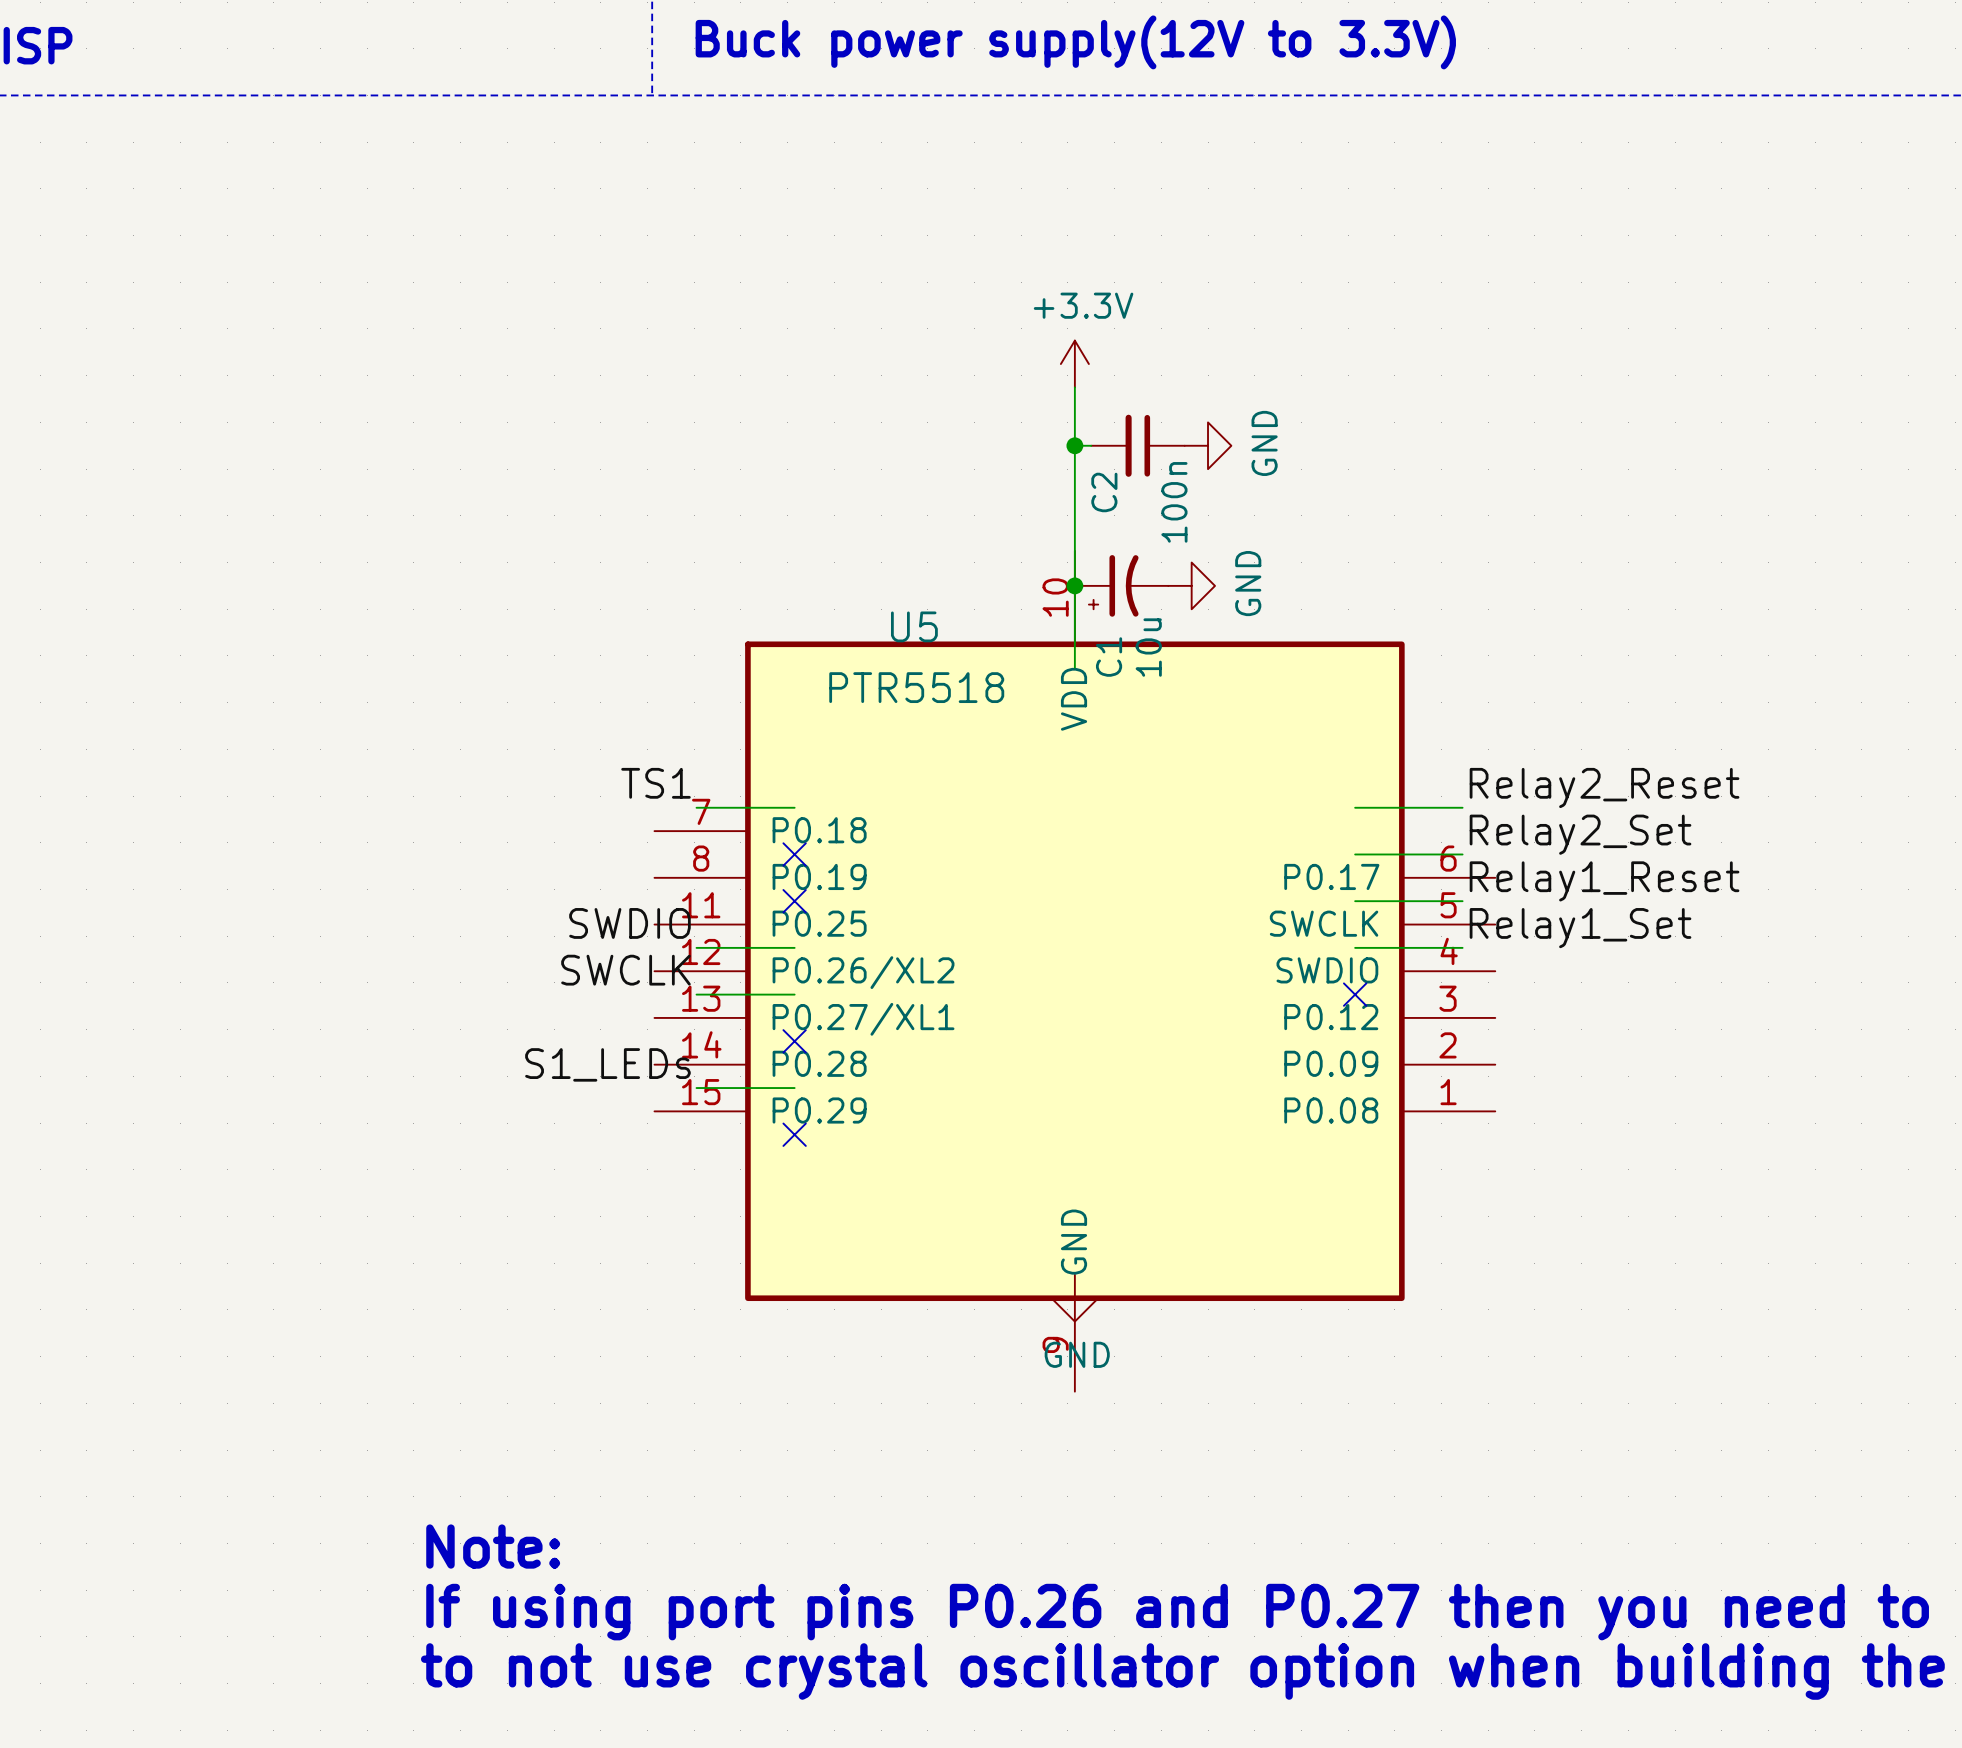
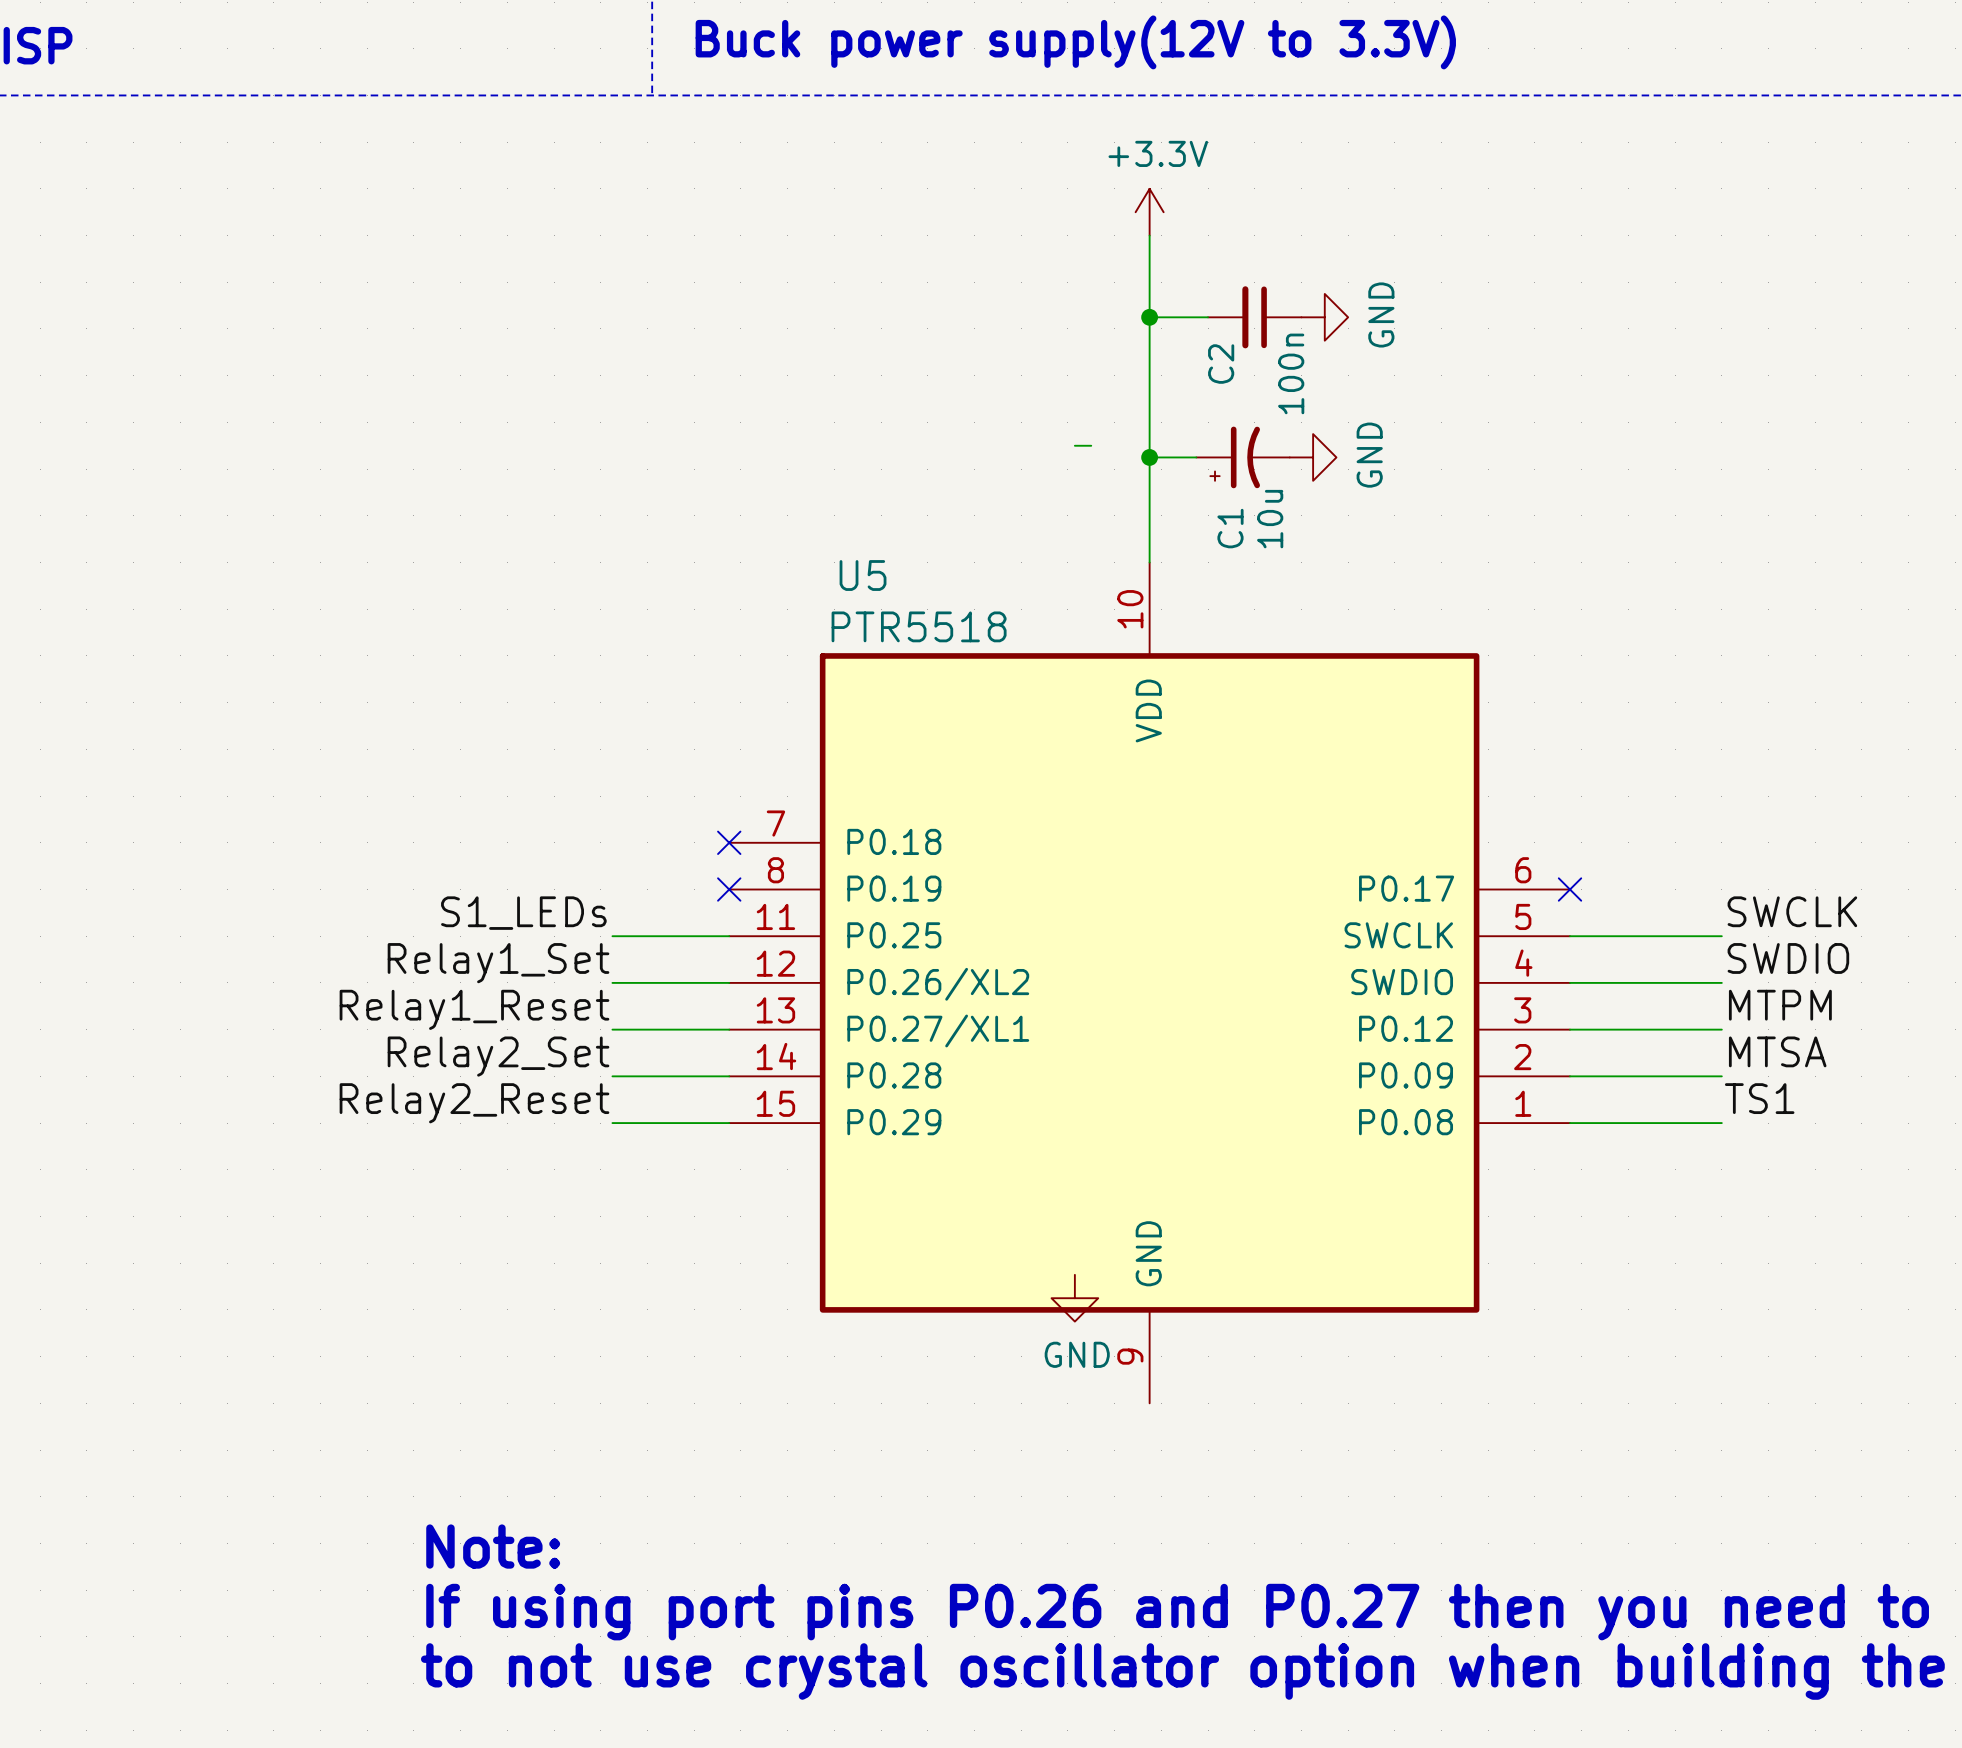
wire: none -> (1149, 235) (1149, 562)
wire: none -> (1149, 317) (1208, 317)
junction: none -> (1149, 317)
power symbol: none -> GND (1324, 317)
power symbol position: +3.3V (1074, 364) -> +3.3V (1149, 212)
wire: (1074, 387) (1074, 667) -> none
junction: (1074, 445) -> none
C2 position: (1137, 445) -> (1254, 317)
power symbol: GND (1208, 445) -> none
wire: none -> (1149, 457) (1196, 457)
junction: none -> (1149, 457)
power symbol: none -> GND (1313, 457)
junction: (1074, 585) -> none
C1 position: (1121, 585) -> (1243, 457)
power symbol: GND (1191, 585) -> none
U5 name position: U5 (914, 626) -> U5 (863, 575)
U5 value position: PTR5518 (916, 687) -> PTR5518 (919, 626)
label: TS1 (655, 783) -> none
label: Relay2_Reset (1604, 787) -> none
wire: (696, 807) (794, 807) -> none
label: Relay2_Set (1580, 834) -> none
no-connect mark: none -> (729, 842)
no-connect mark: (794, 854) -> none
label: Relay1_Reset (1604, 881) -> none
no-connect mark: none -> (729, 889)
no-connect mark: none -> (1570, 889)
no-connect mark: (794, 901) -> none
label: none -> SWCLK (1792, 911)
label: SWDIO (629, 923) -> none
label: Relay1_Set (1580, 928) -> none
wire: none -> (612, 936) (729, 936)
wire: none -> (1570, 936) (1721, 936)
wire: (696, 947) (794, 947) -> none
label: none -> SWDIO (1788, 958)
label: none -> Relay1_Set (498, 963)
label: SWCLK (625, 970) -> none
U5 position: (1074, 971) -> (1149, 982)
wire: none -> (612, 982) (729, 982)
wire: none -> (1570, 982) (1721, 982)
wire: (696, 994) (794, 994) -> none
no-connect mark: (1355, 994) -> none
label: none -> MTPM (1780, 1005)
label: none -> Relay1_Reset (474, 1009)
wire: none -> (612, 1029) (729, 1029)
wire: none -> (1570, 1029) (1721, 1029)
no-connect mark: (794, 1041) -> none
label: none -> MTSA (1777, 1051)
label: none -> Relay2_Set (498, 1056)
label position: S1_LEDs (607, 1064) -> S1_LEDs (523, 913)
wire: none -> (612, 1076) (729, 1076)
wire: none -> (1570, 1076) (1721, 1076)
wire: (696, 1088) (794, 1088) -> none
label: none -> TS1 (1759, 1098)
label: none -> Relay2_Reset (474, 1103)
wire: none -> (612, 1123) (729, 1123)
wire: none -> (1570, 1123) (1721, 1123)
no-connect mark: (794, 1134) -> none

